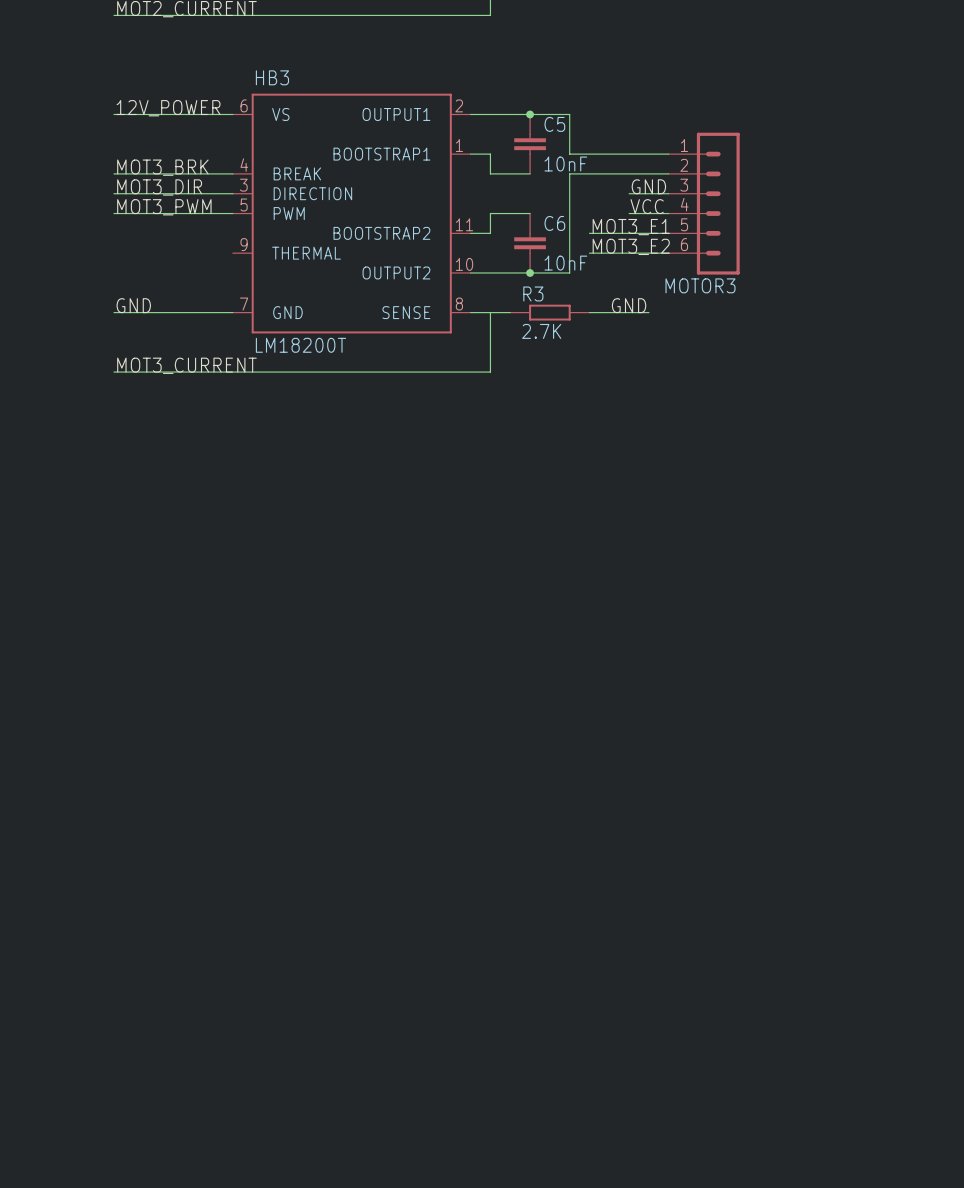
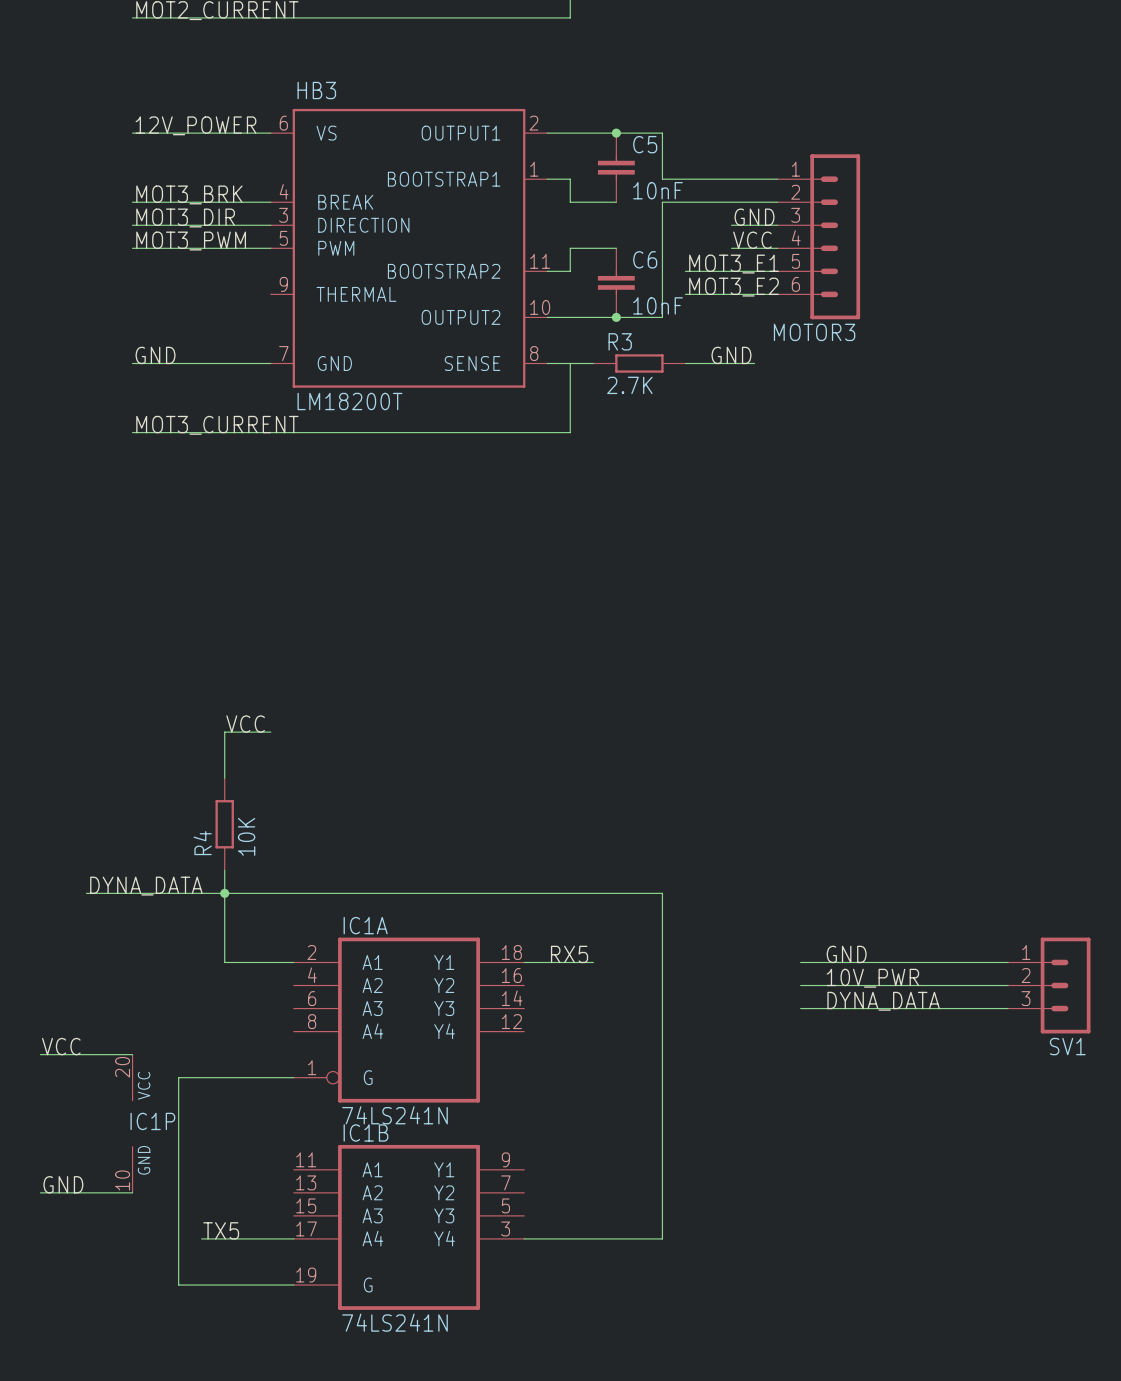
label: none -> VCC (245, 724)
wire: none -> (270, 732) (224, 732) (224, 778)
R4: none -> 10K (224, 824)
wire: none -> (224, 870) (224, 962) (293, 962)
label: none -> DYNA_DATA (146, 886)
wire: none -> (86, 893) (662, 893) (662, 1238) (524, 1238)
junction: none -> (224, 893)
label: none -> RX5 (569, 954)
label: none -> GND (846, 954)
wire: none -> (524, 962) (593, 962)
wire: none -> (800, 962) (1008, 962)
label: none -> 10V_PWR (872, 978)
wire: none -> (800, 985) (1008, 985)
SV1: none -> (1049, 985)
label: none -> DYNA_DATA (883, 1001)
wire: none -> (800, 1008) (1008, 1008)
IC1A: none -> 74LS241N (409, 1020)
label: none -> VCC (61, 1046)
wire: none -> (40, 1054) (132, 1054)
wire: none -> (293, 1077) (178, 1077) (178, 1285) (293, 1285)
IC1P: none -> (132, 1123)
label: none -> GND (63, 1184)
wire: none -> (40, 1192) (132, 1192)
IC1B: none -> 74LS241N (409, 1227)
label: none -> TX5 (221, 1230)
wire: none -> (201, 1238) (293, 1238)

